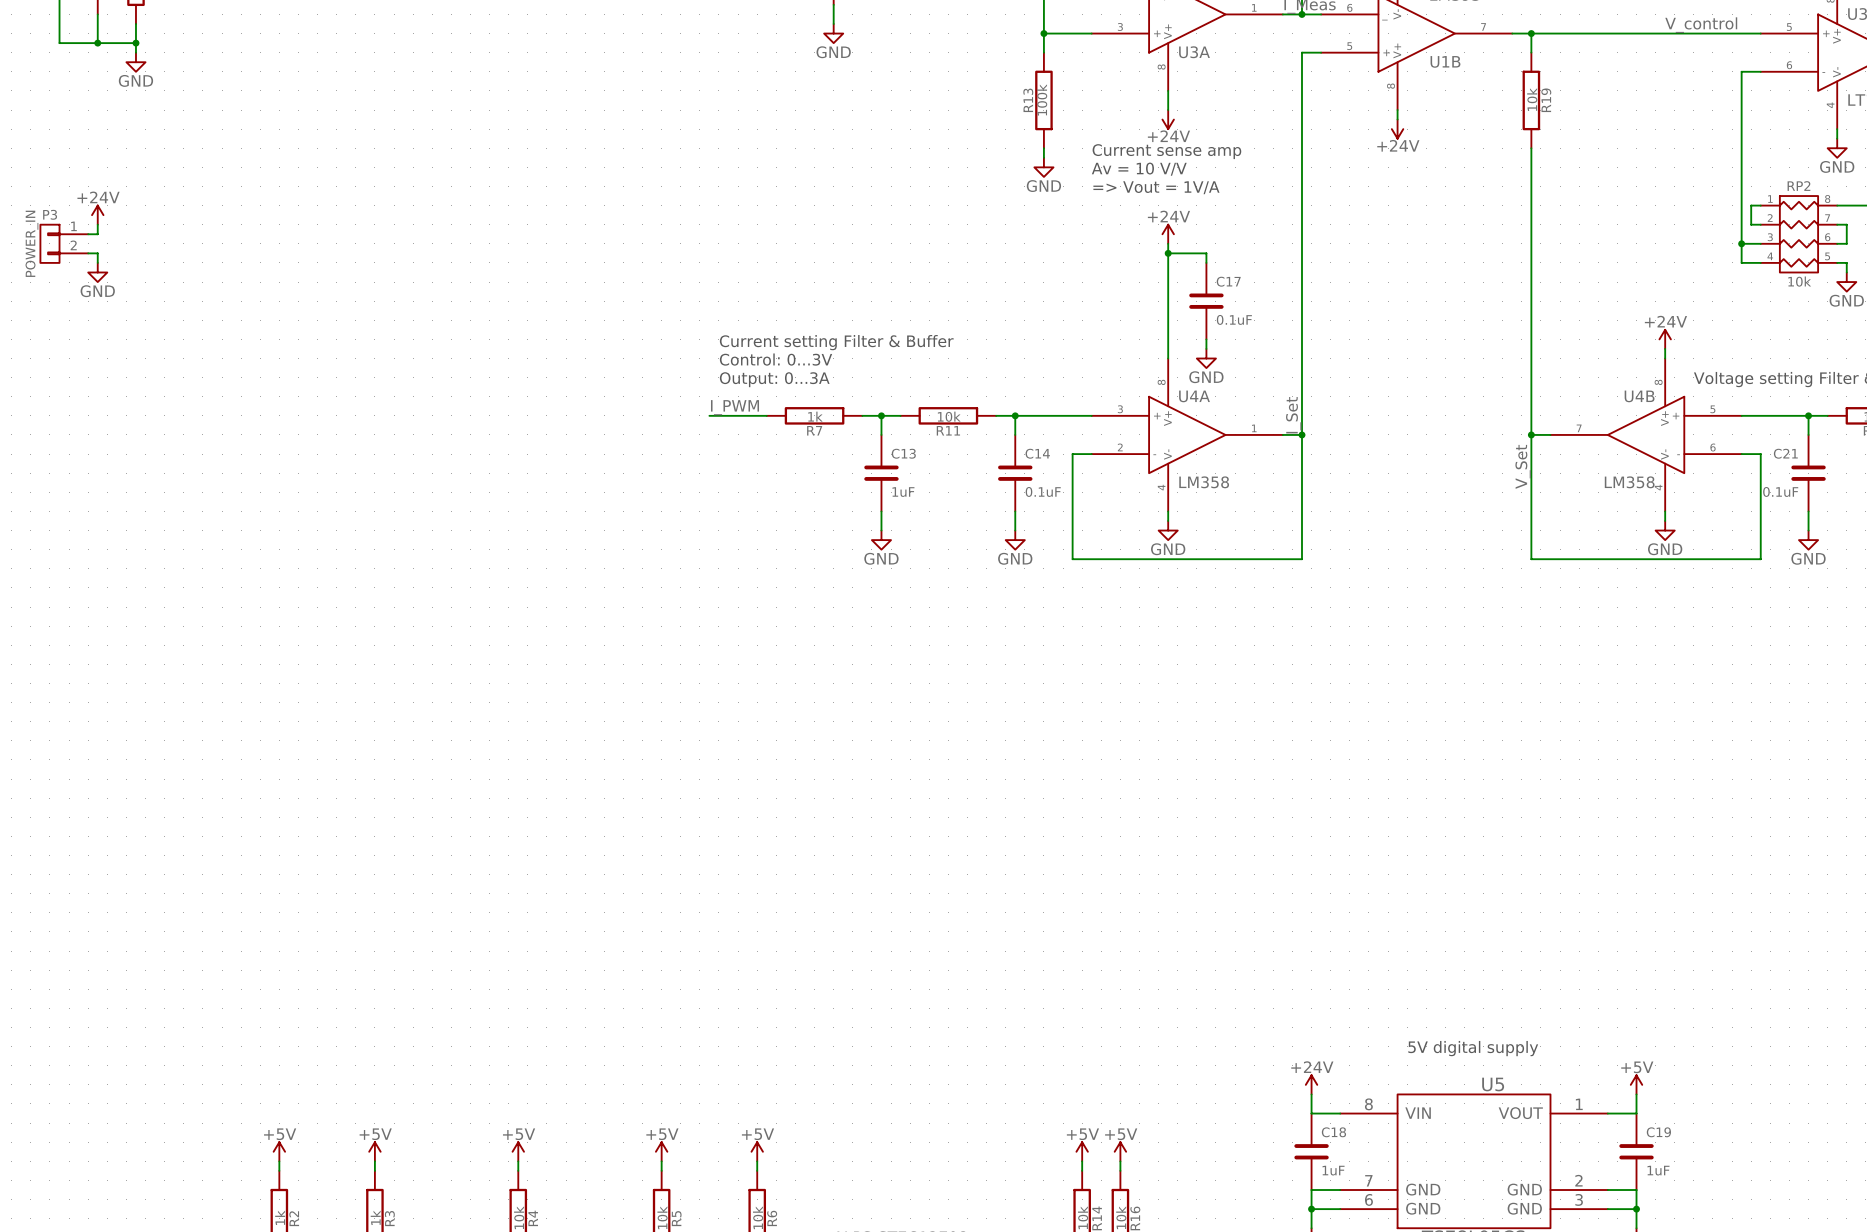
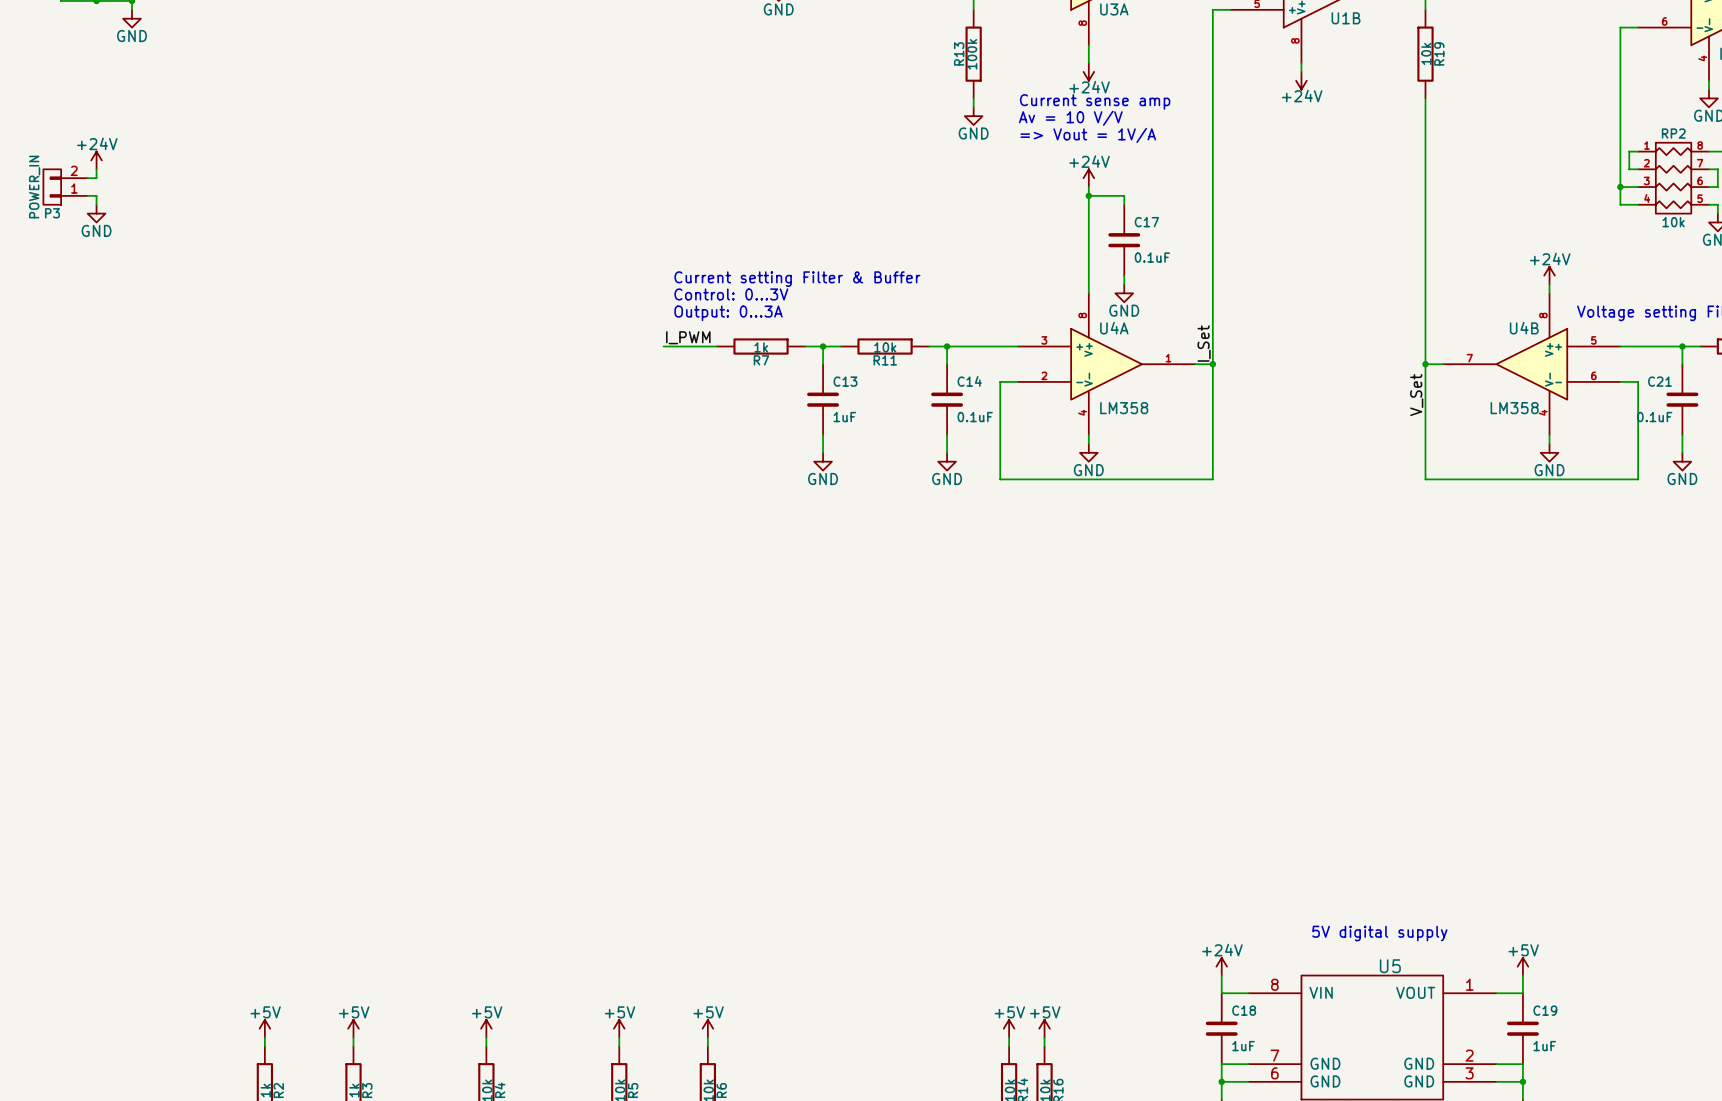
P3 flip: as is (49, 243) -> up-down (52, 187)

